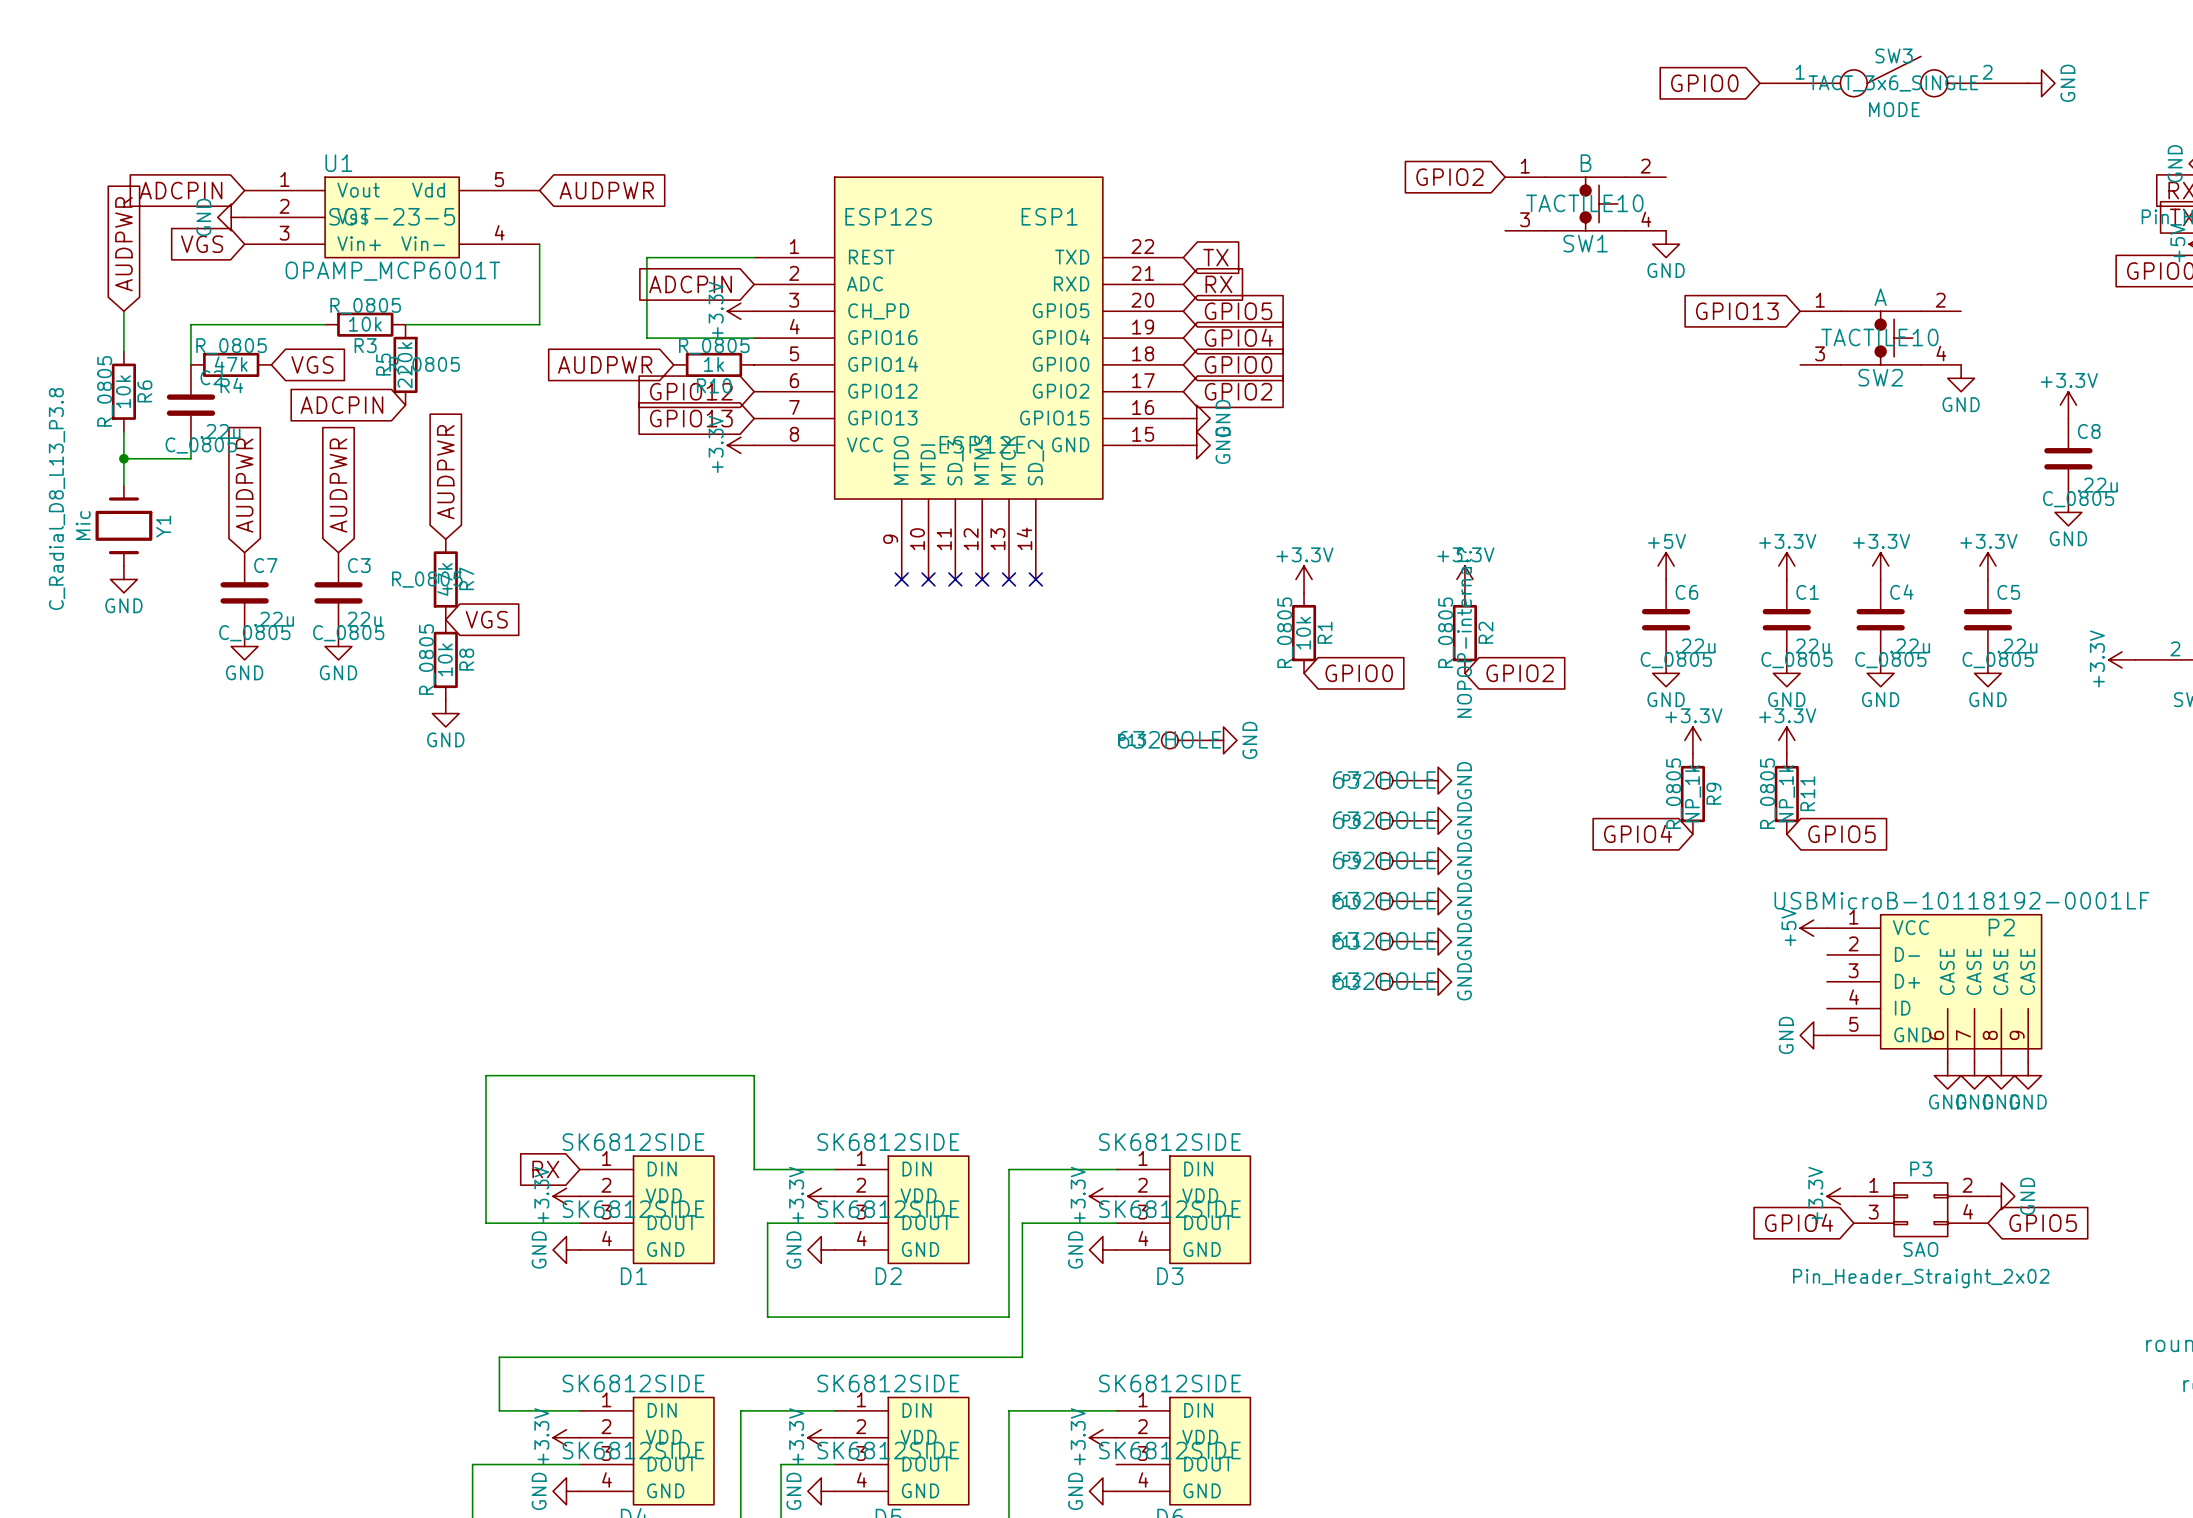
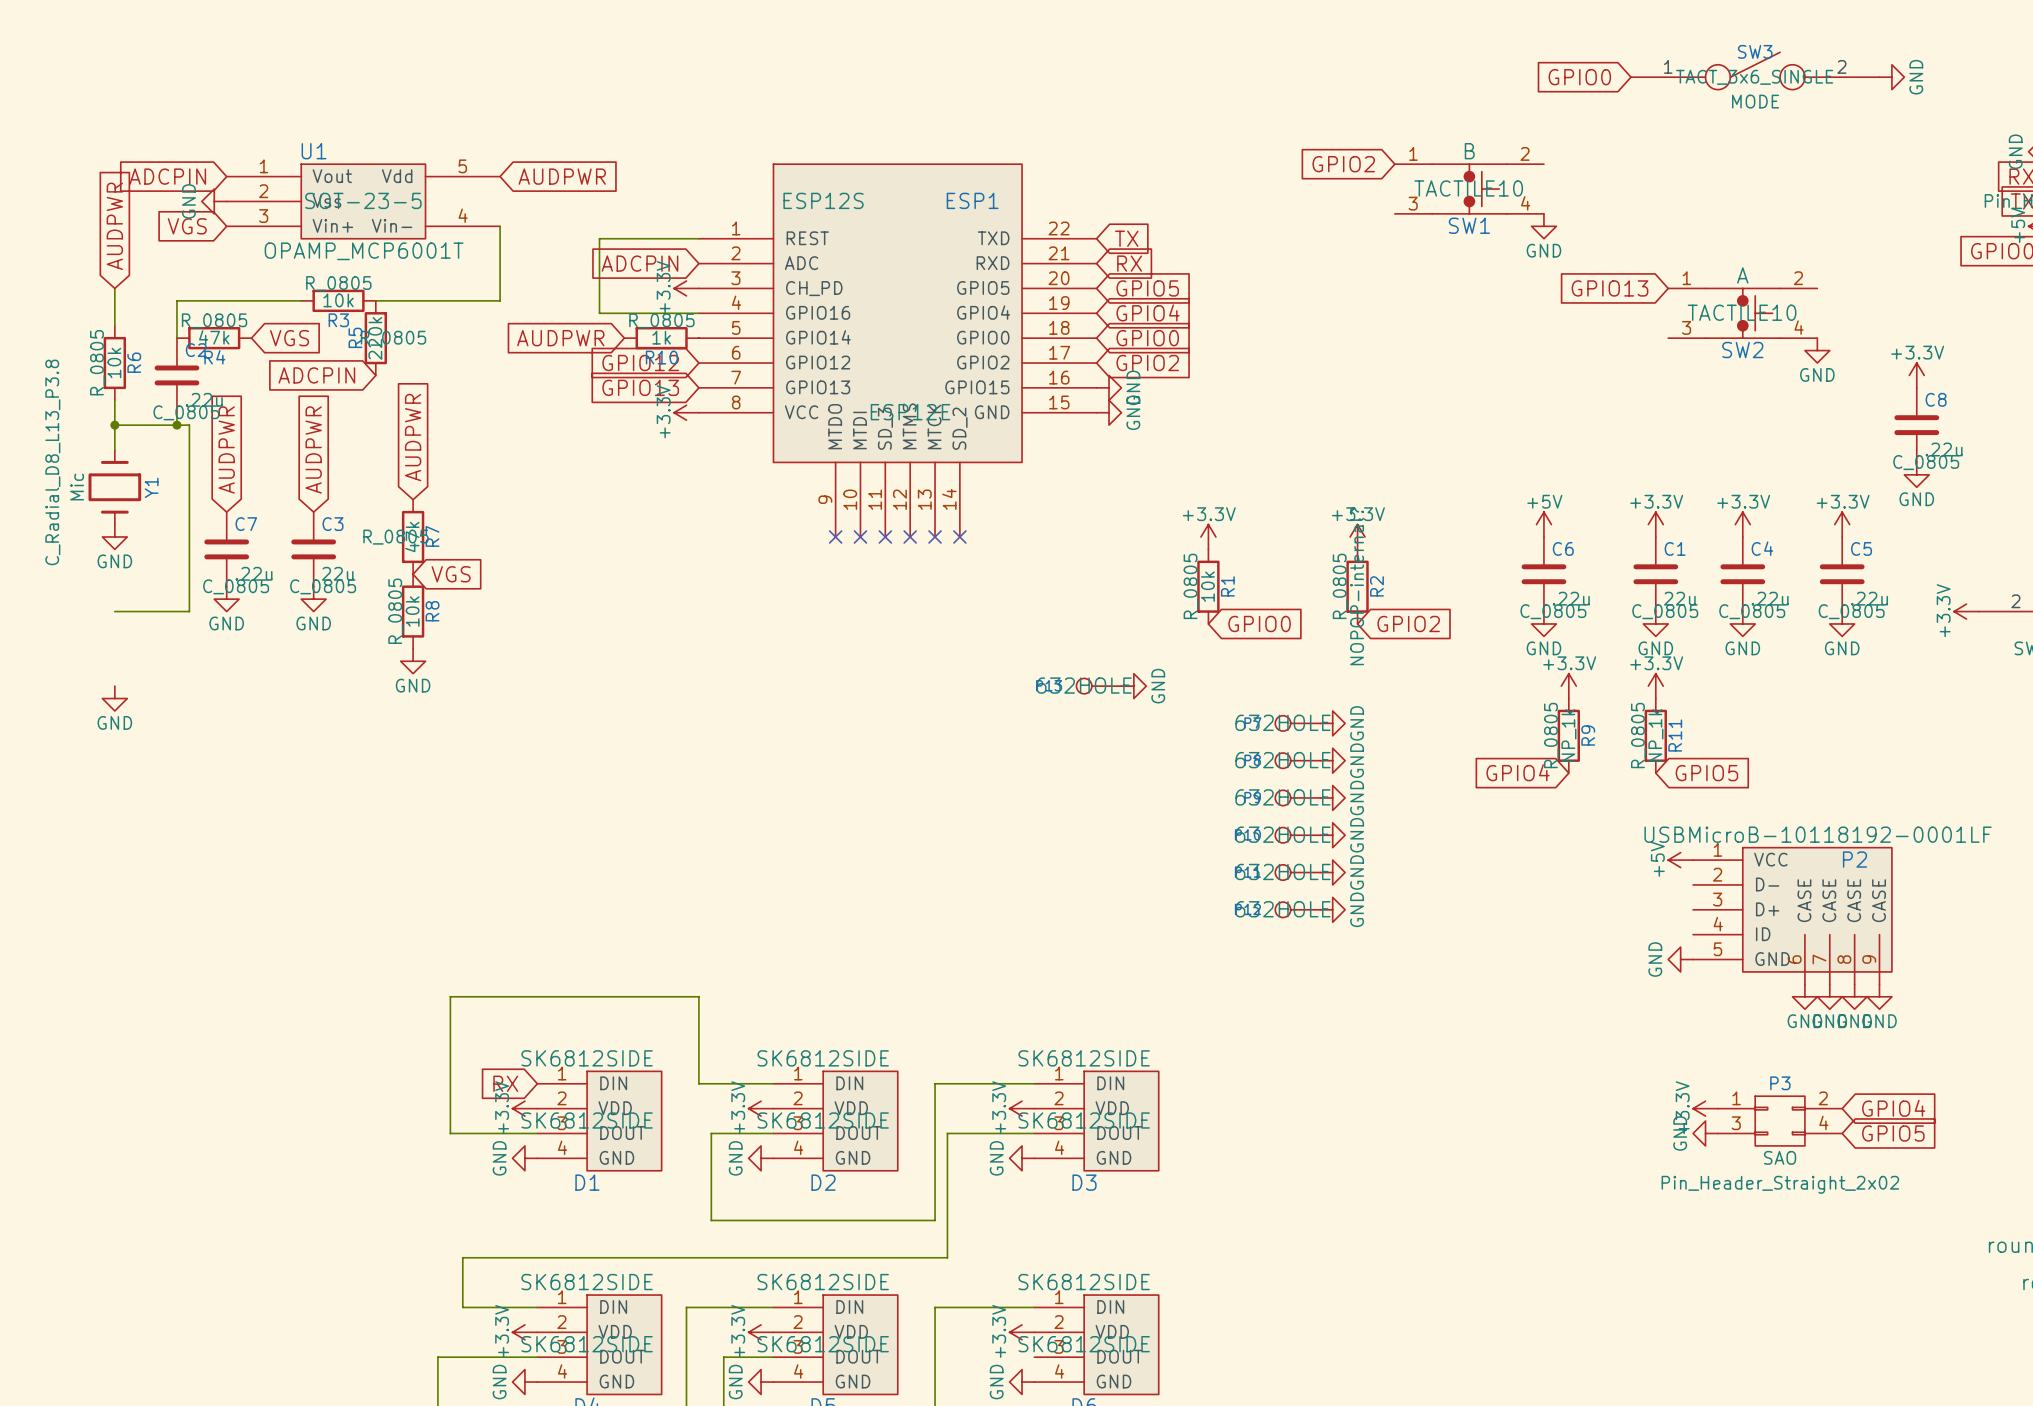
wire: none -> (176, 425) (189, 425) (189, 611) (114, 611)
junction: none -> (176, 425)
power symbol: none -> GND (114, 698)
power symbol rotation: 0° (2001, 1196) -> 180° (1705, 1133)
power symbol position: GND (2001, 1196) -> GND (1705, 1133)
global label rotation: 0° (1799, 1222) -> 180° (1893, 1108)
global label position: GPIO4 (1799, 1222) -> GPIO4 (1893, 1108)

